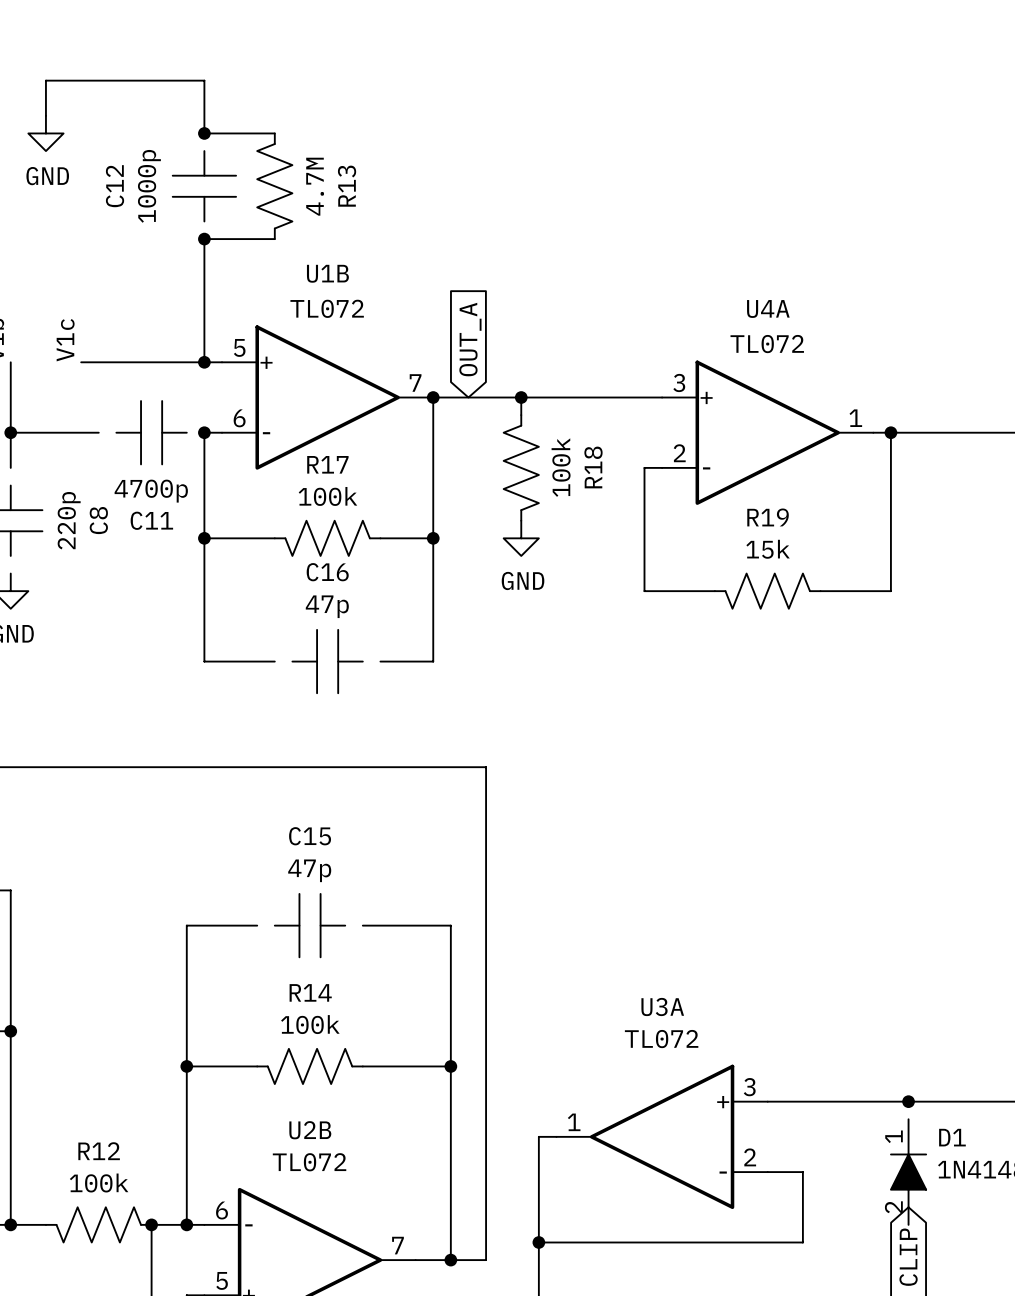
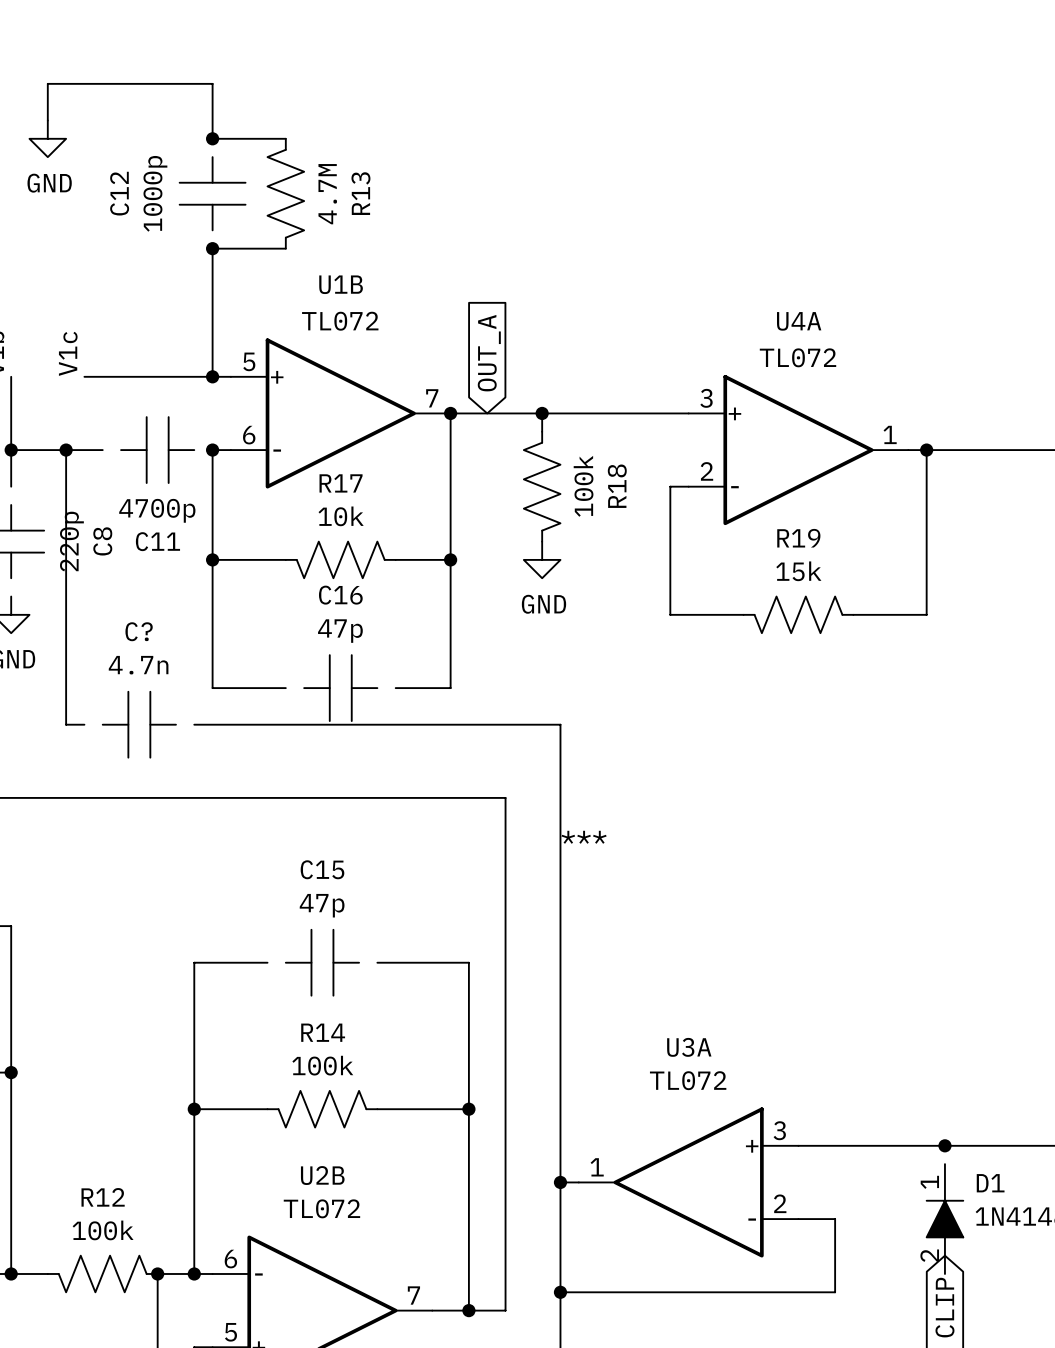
wire: none -> (66, 450) (66, 724) (84, 724)
junction: none -> (66, 450)
R17 value: 100k (327, 496) -> 10k (341, 516)
C?: none -> 4.7n (139, 724)
wire: none -> (194, 724) (560, 724) (560, 1182)
label: none -> *** (584, 837)
junction: none -> (560, 1182)

